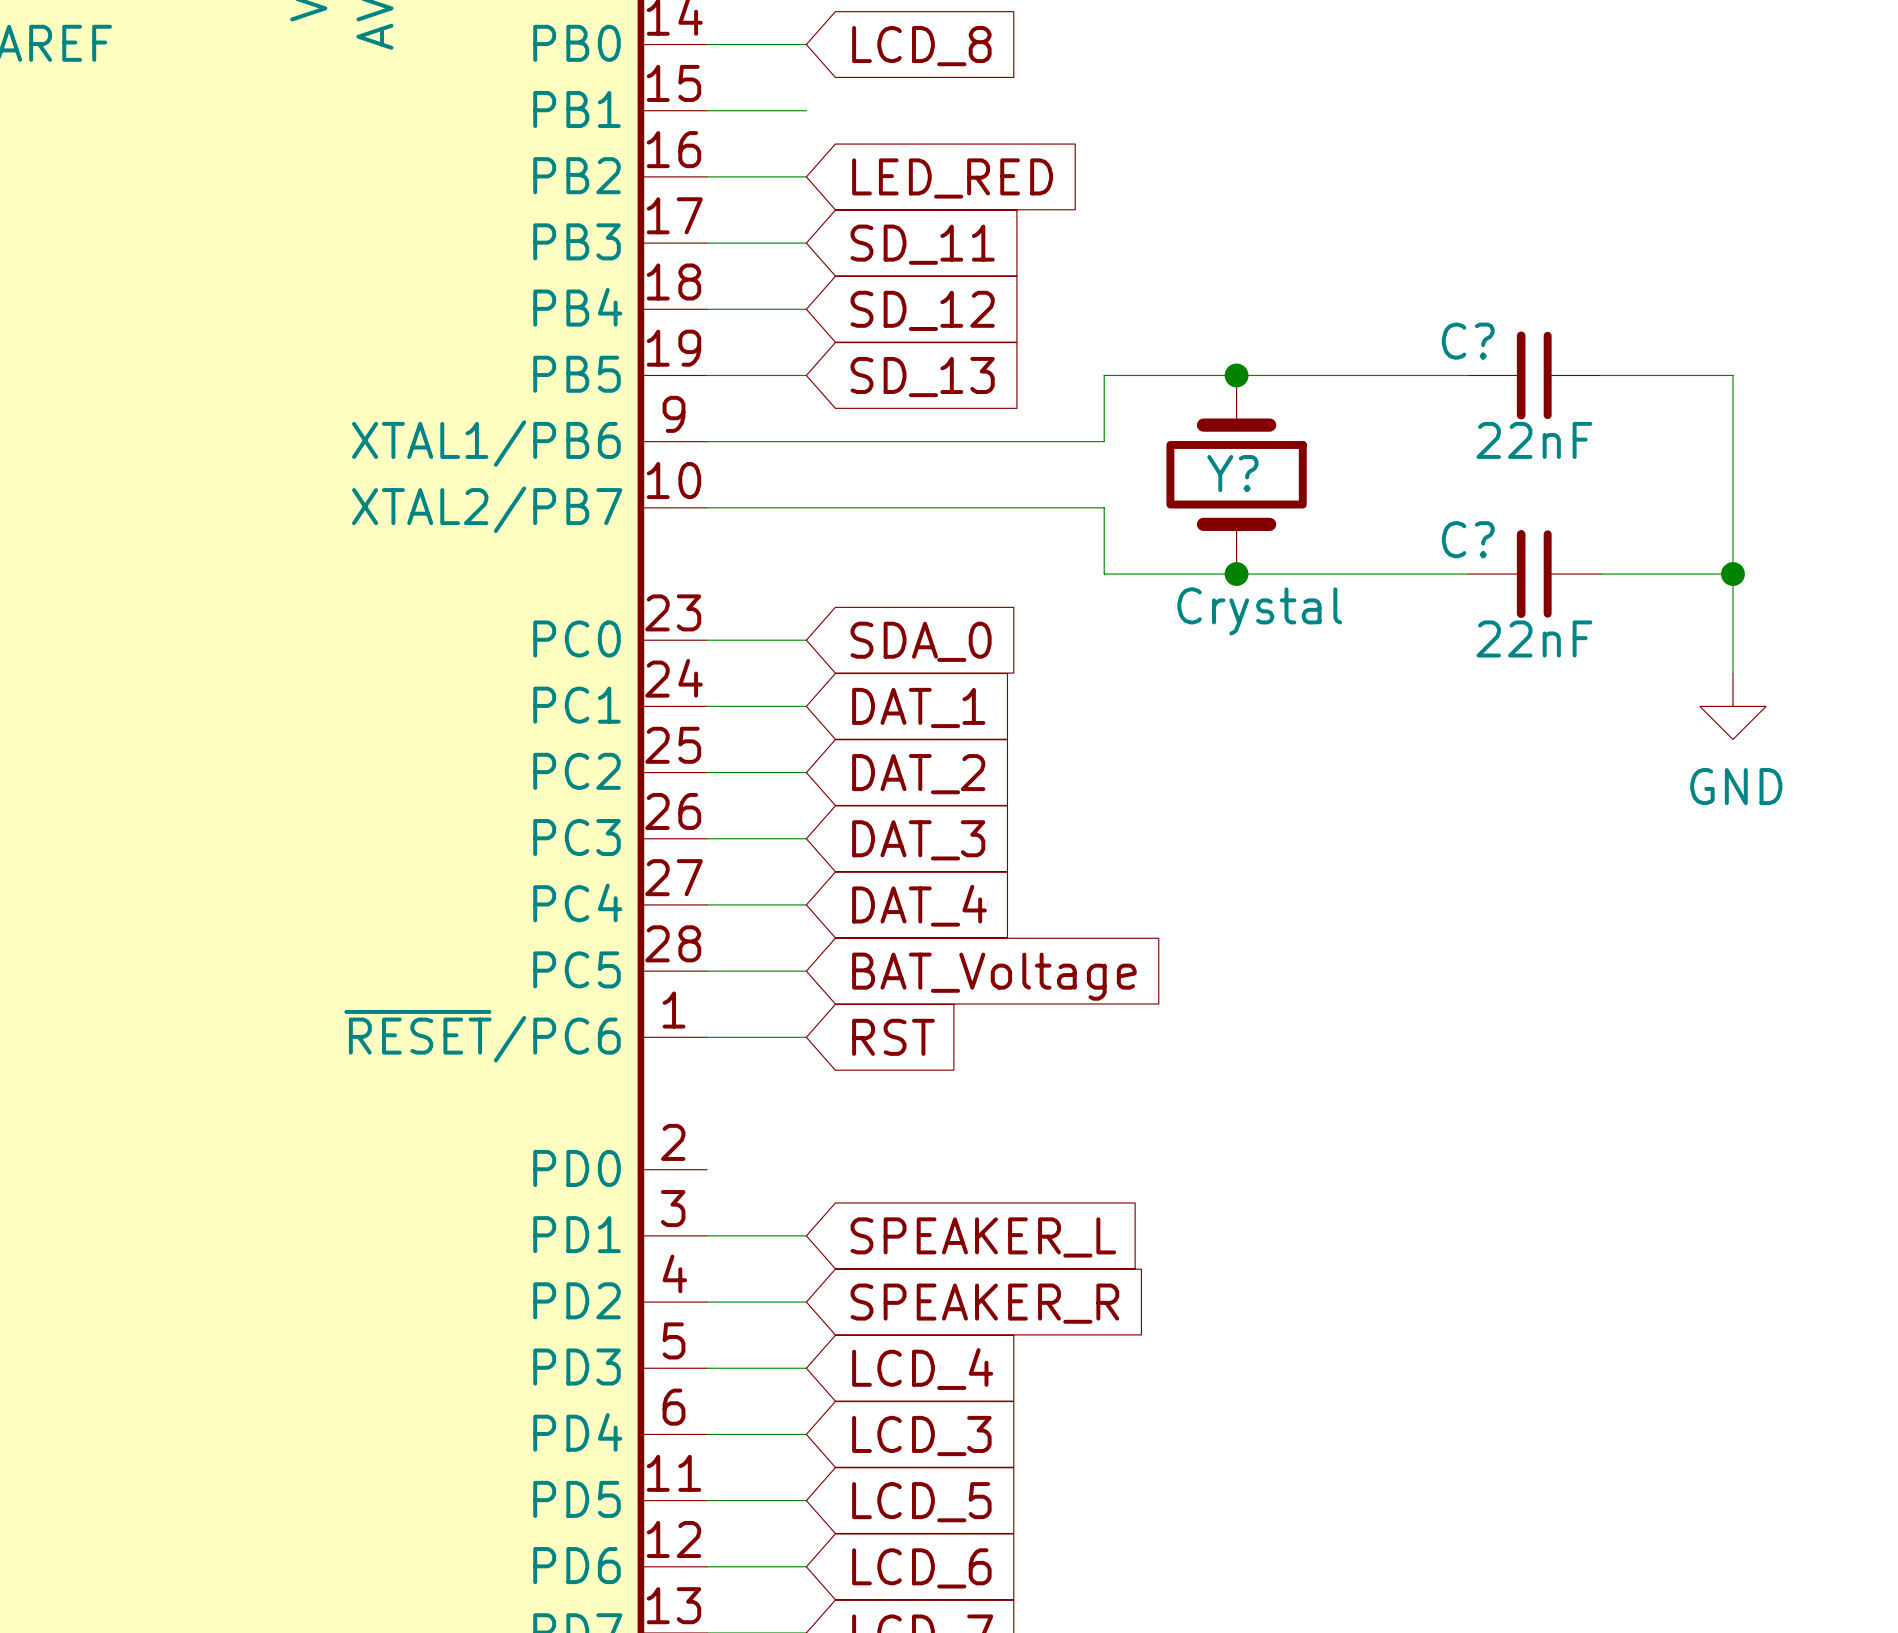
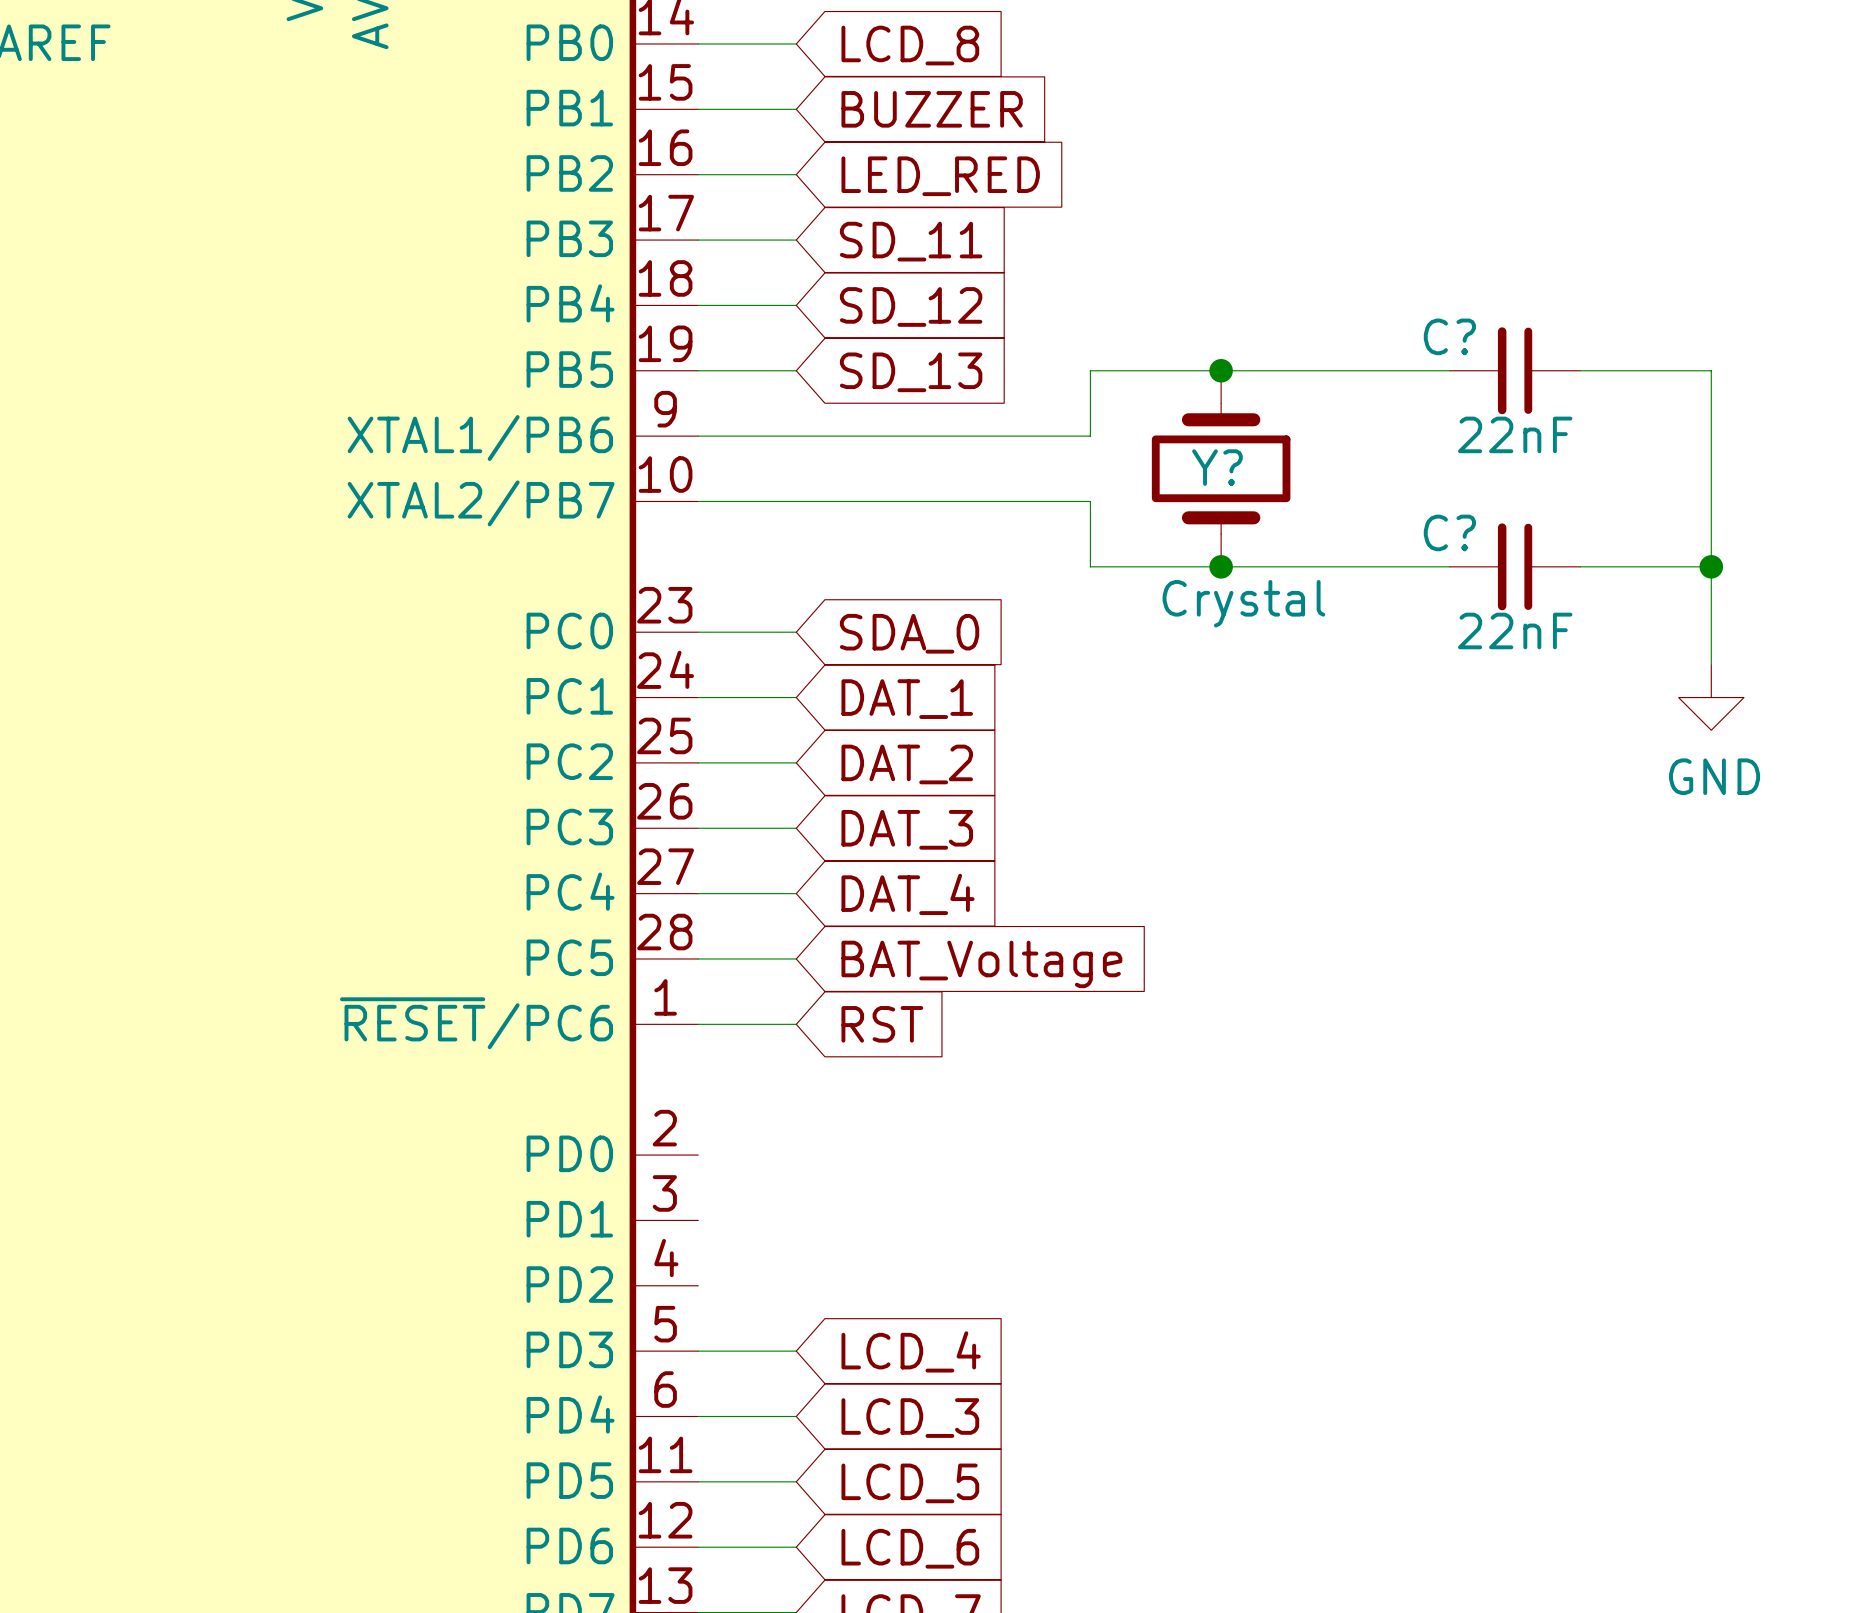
global label: none -> BUZZER (932, 109)
wire: (707, 1235) (806, 1235) -> none
global label: SPEAKER_L (983, 1237) -> none
wire: (707, 1302) (806, 1302) -> none
global label: SPEAKER_R (984, 1303) -> none

